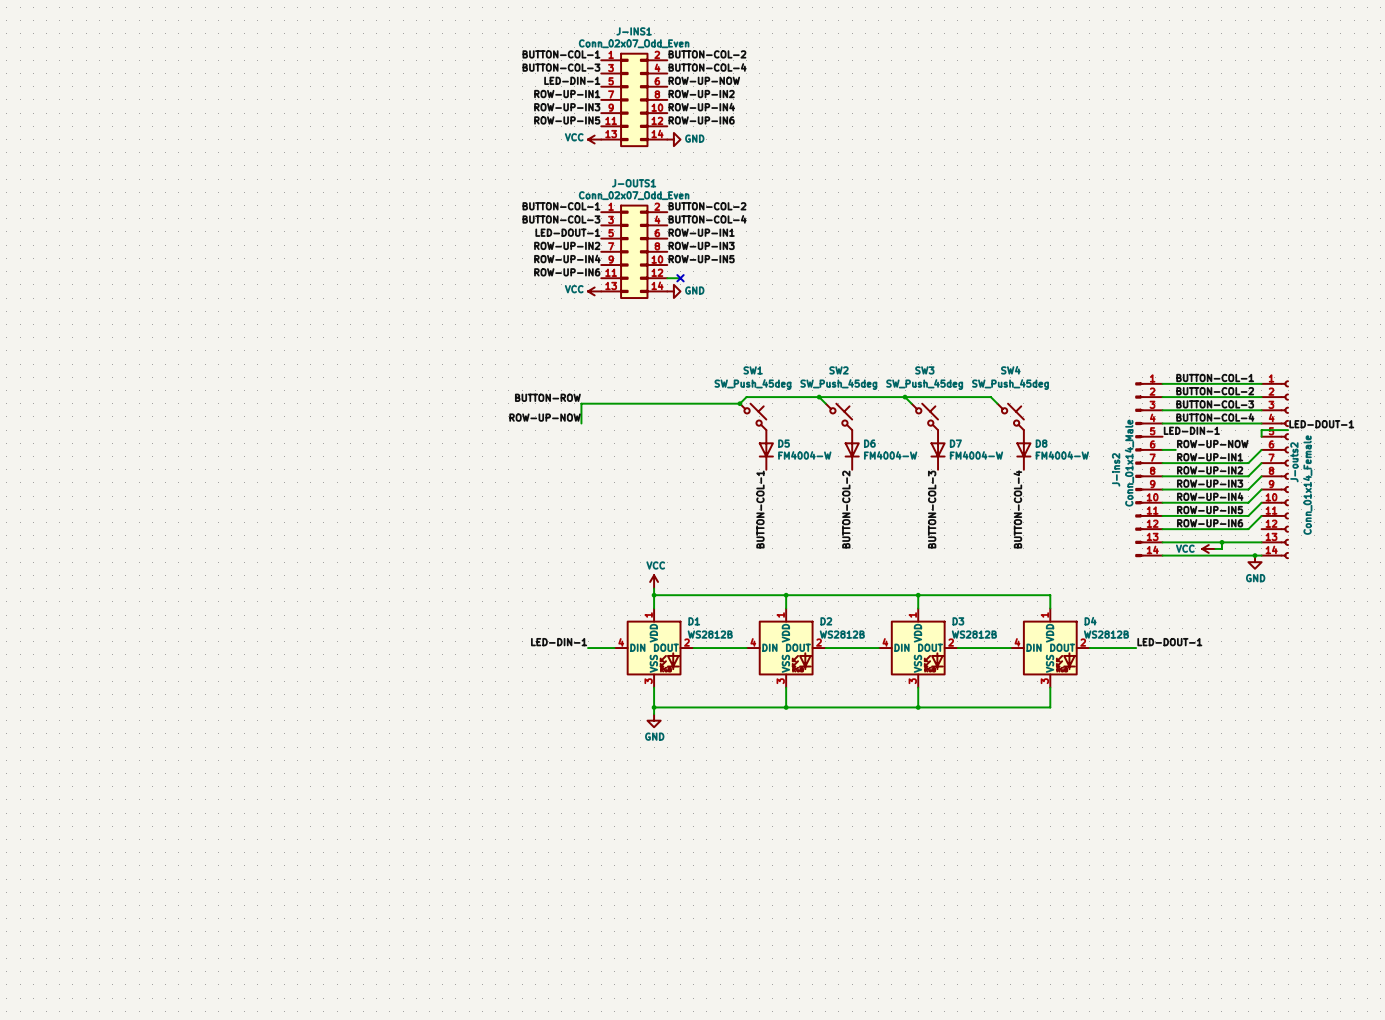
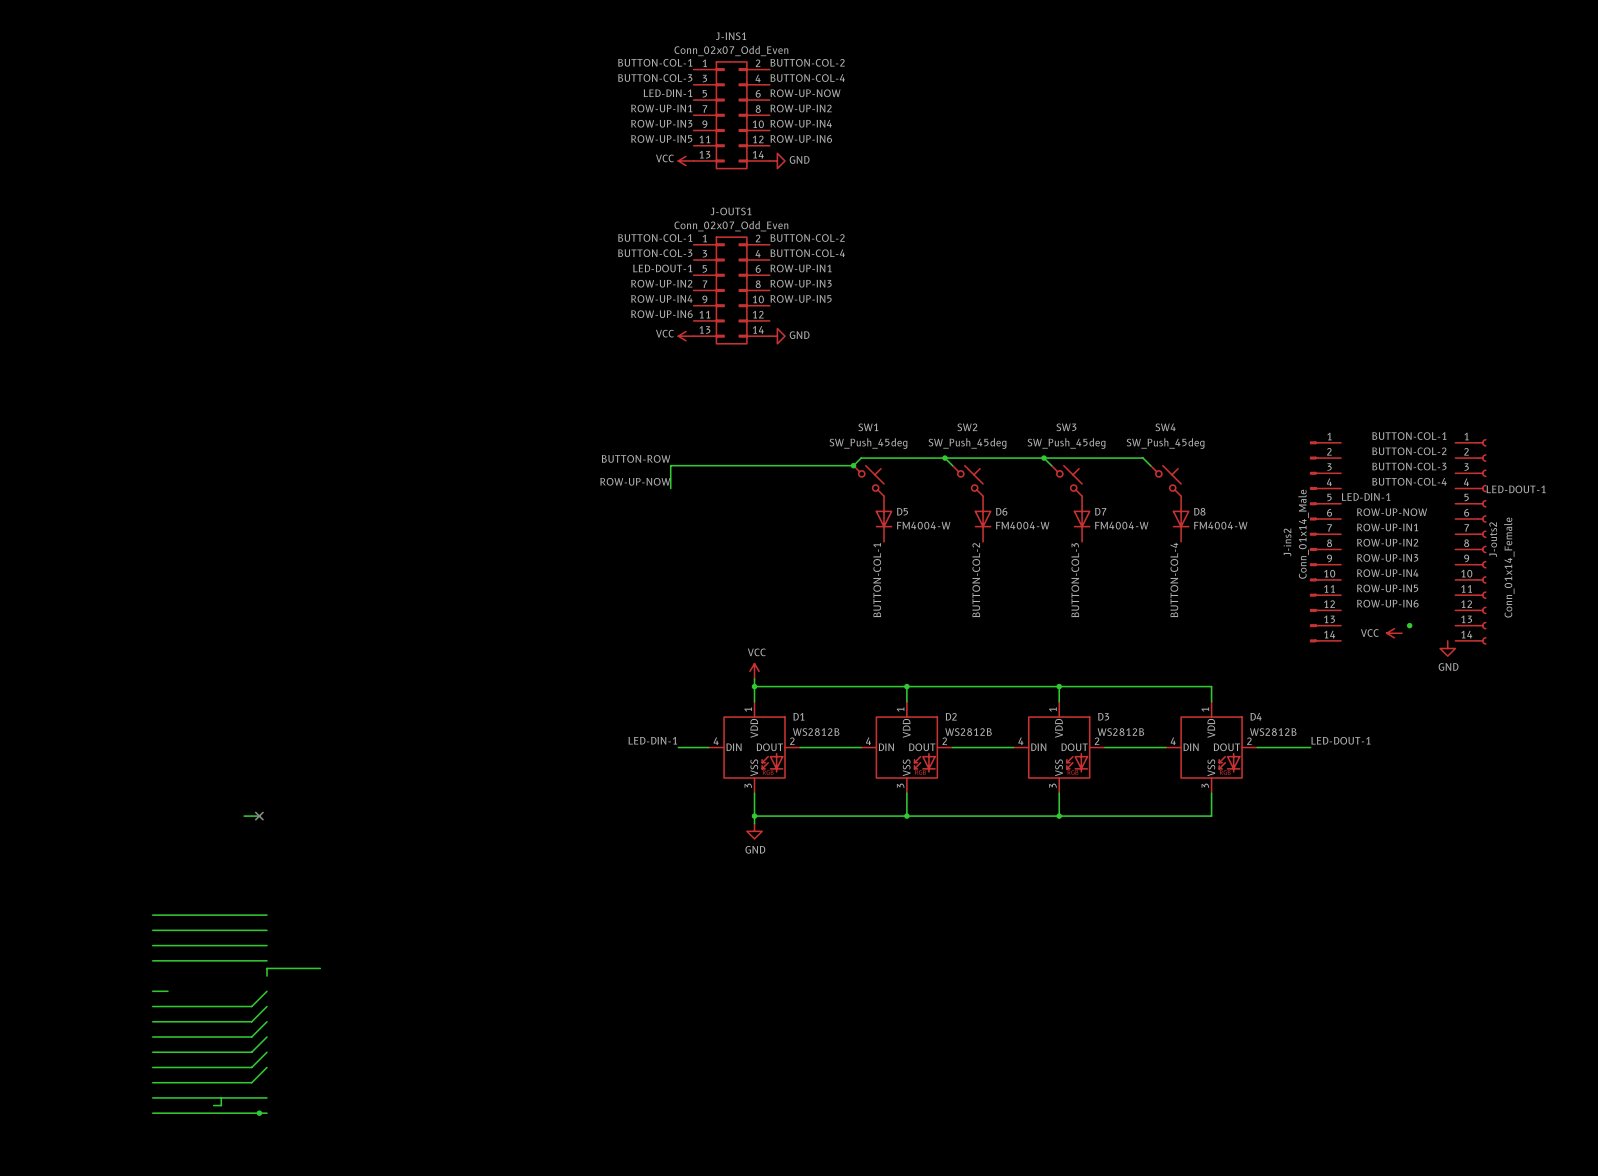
wire: (667, 278) (680, 278) -> none
no-connect mark: (680, 278) -> none
wire: (1162, 383) (1261, 383) -> none
wire: (1162, 397) (1261, 397) -> none
wire: (1162, 410) (1261, 410) -> none
wire: (1162, 423) (1261, 423) -> none
wire: (1288, 430) (1261, 430) (1261, 436) -> none
wire: (1162, 449) (1175, 449) -> none
wire: (1261, 449) (1248, 463) (1162, 463) -> none
wire: (1261, 463) (1248, 476) (1162, 476) -> none
wire: (1261, 476) (1248, 489) (1162, 489) -> none
wire: (1261, 489) (1248, 502) (1162, 502) -> none
wire: (1261, 502) (1248, 515) (1162, 515) -> none
wire: (1261, 515) (1248, 529) (1162, 529) -> none
wire: (1162, 542) (1261, 542) -> none
wire: (1221, 542) (1221, 548) (1215, 548) -> none
wire: (1162, 555) (1261, 555) -> none
junction: (1255, 555) -> none
wire: none -> (244, 816) (259, 816)
no-connect mark: none -> (259, 816)
wire: none -> (152, 915) (266, 915)
wire: none -> (152, 930) (266, 930)
wire: none -> (152, 945) (266, 945)
wire: none -> (152, 960) (266, 960)
wire: none -> (320, 968) (266, 968) (266, 976)
wire: none -> (152, 991) (167, 991)
wire: none -> (266, 991) (251, 1006) (152, 1006)
wire: none -> (266, 1006) (251, 1021) (152, 1021)
wire: none -> (266, 1021) (251, 1037) (152, 1037)
wire: none -> (266, 1037) (251, 1052) (152, 1052)
wire: none -> (266, 1052) (251, 1067) (152, 1067)
wire: none -> (266, 1067) (251, 1082) (152, 1082)
wire: none -> (152, 1097) (266, 1097)
wire: none -> (221, 1097) (221, 1105) (213, 1105)
wire: none -> (152, 1113) (266, 1113)
junction: none -> (259, 1113)

